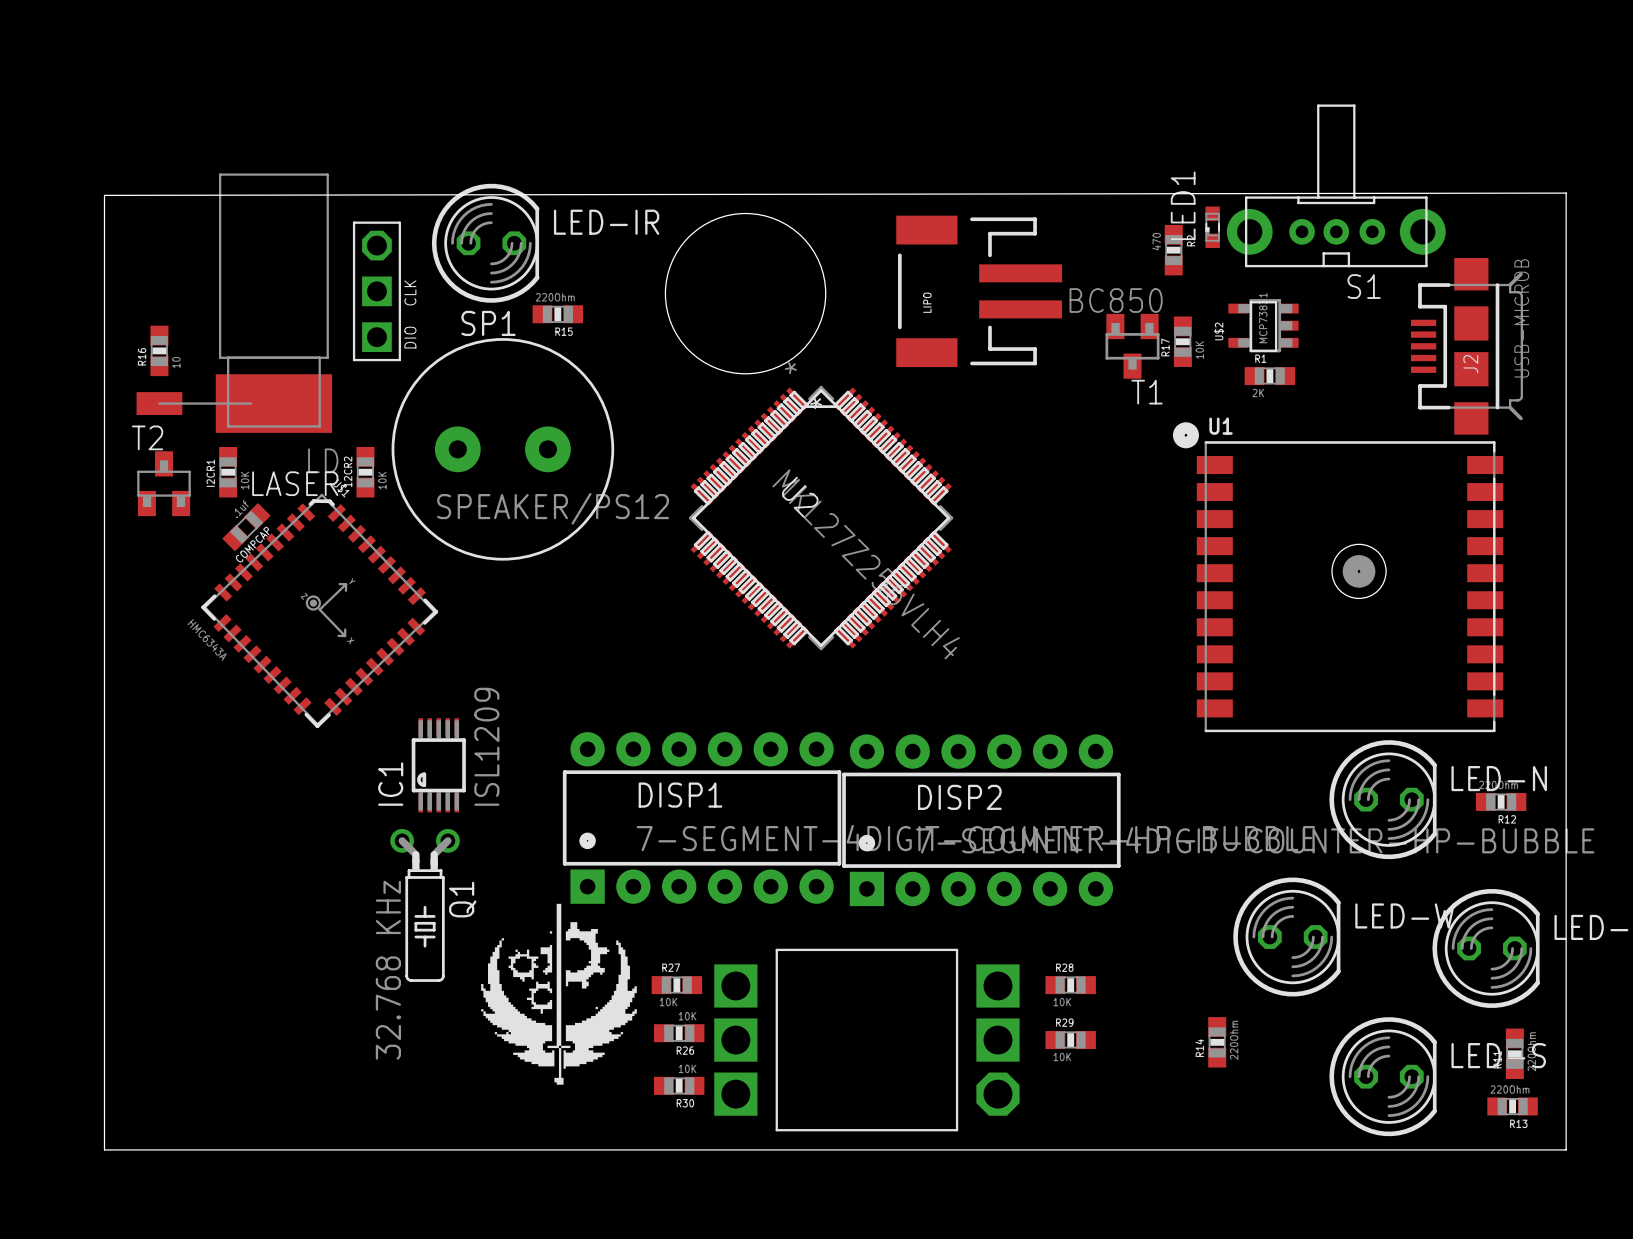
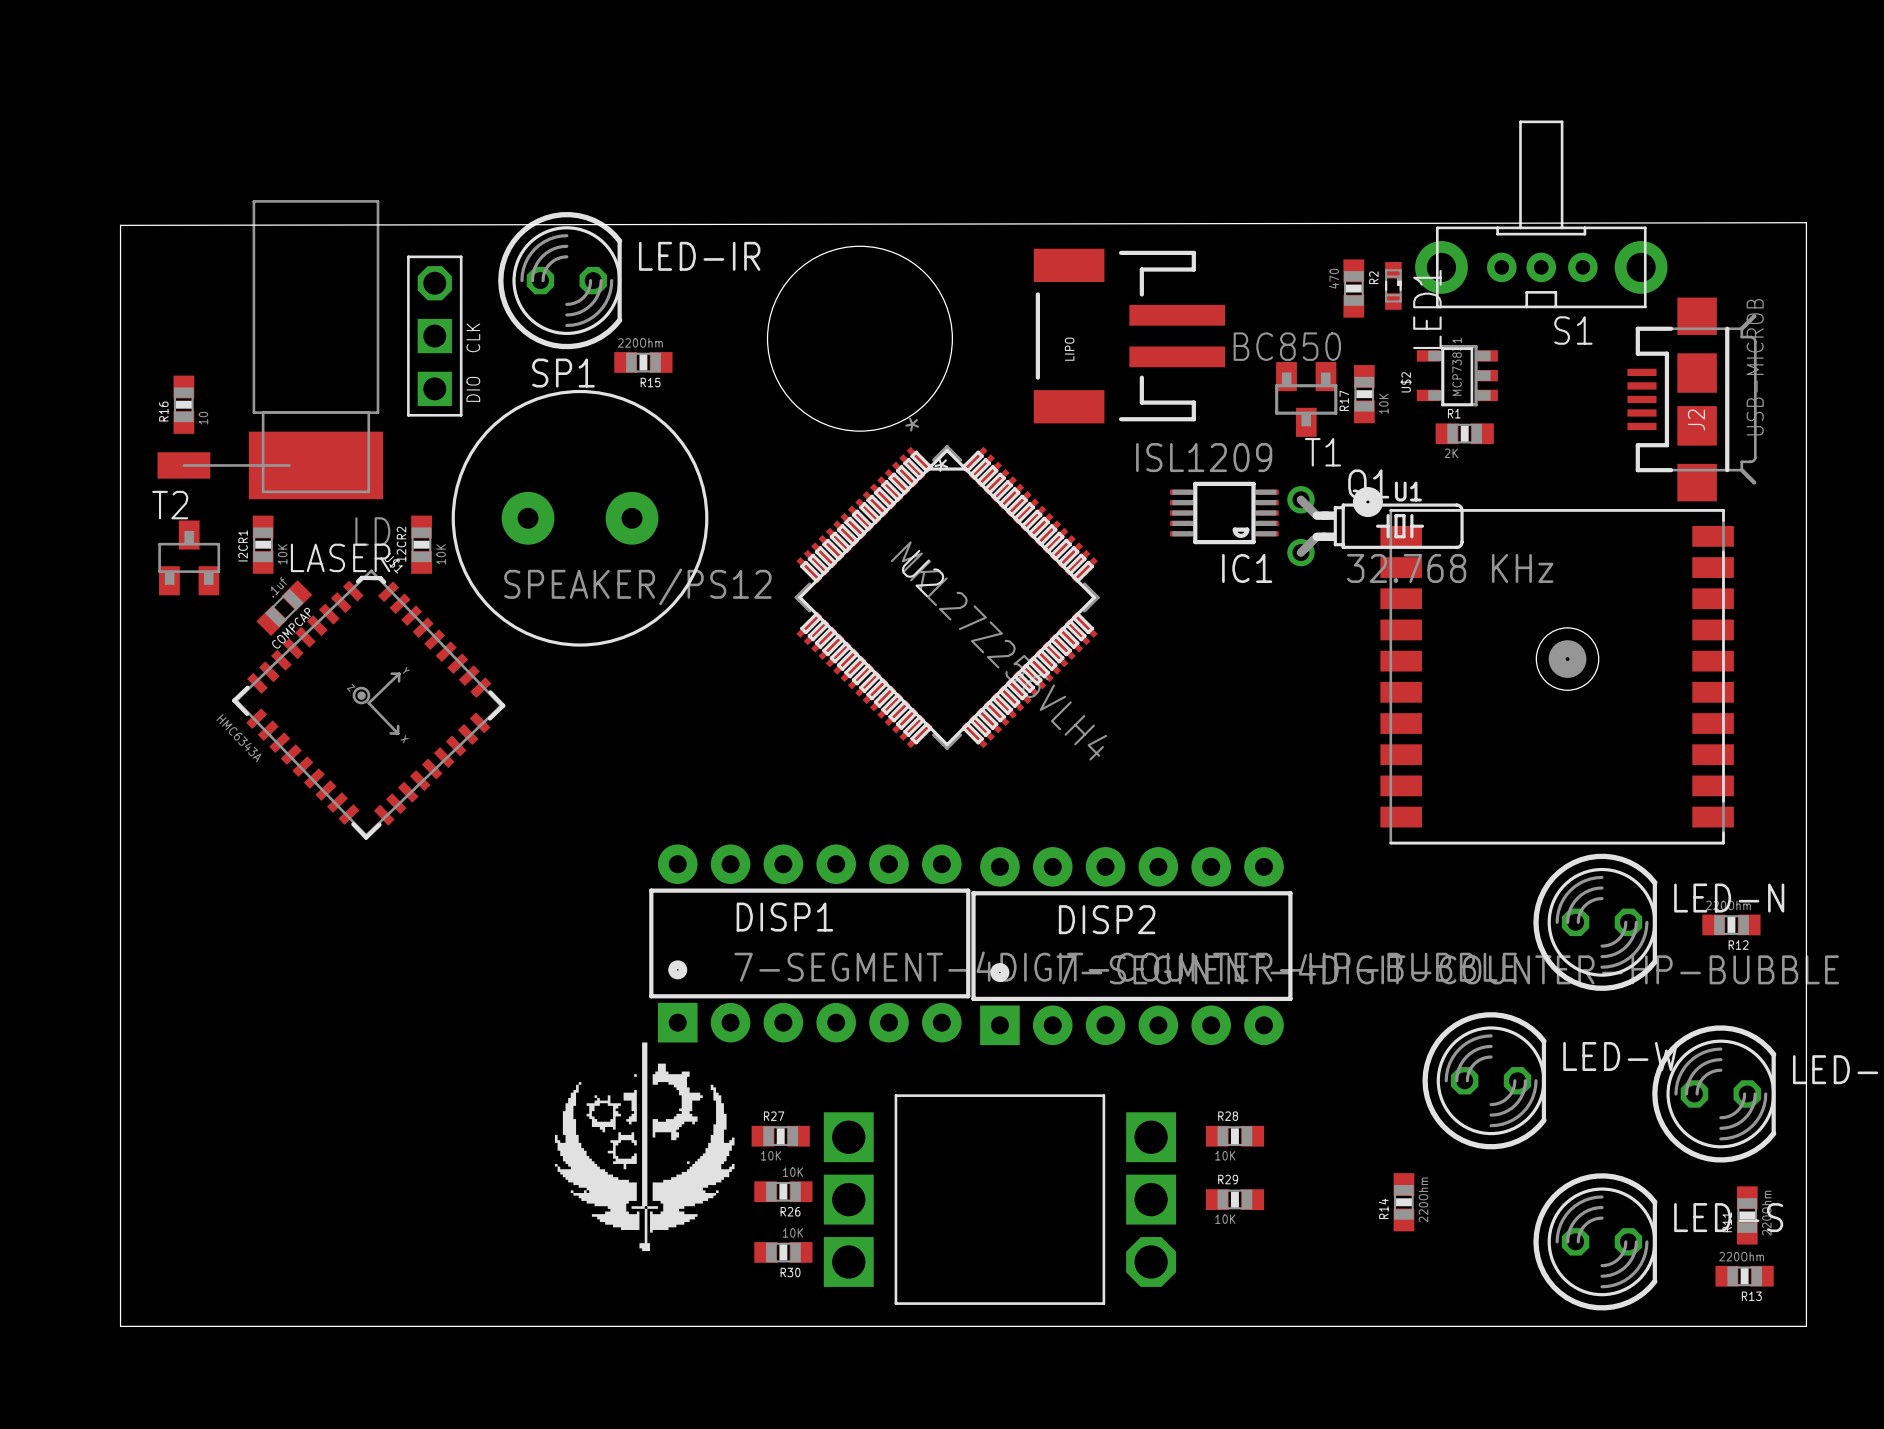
LED1 rotation: 0° (1212, 227) -> 180° (1393, 285)
IC1 rotation: 0° (438, 765) -> 90° counterclockwise (1224, 513)
IC1 position: (438, 765) -> (1224, 513)
Q1 rotation: 0° (425, 905) -> 90° counterclockwise (1375, 526)
Q1 position: (425, 905) -> (1375, 526)

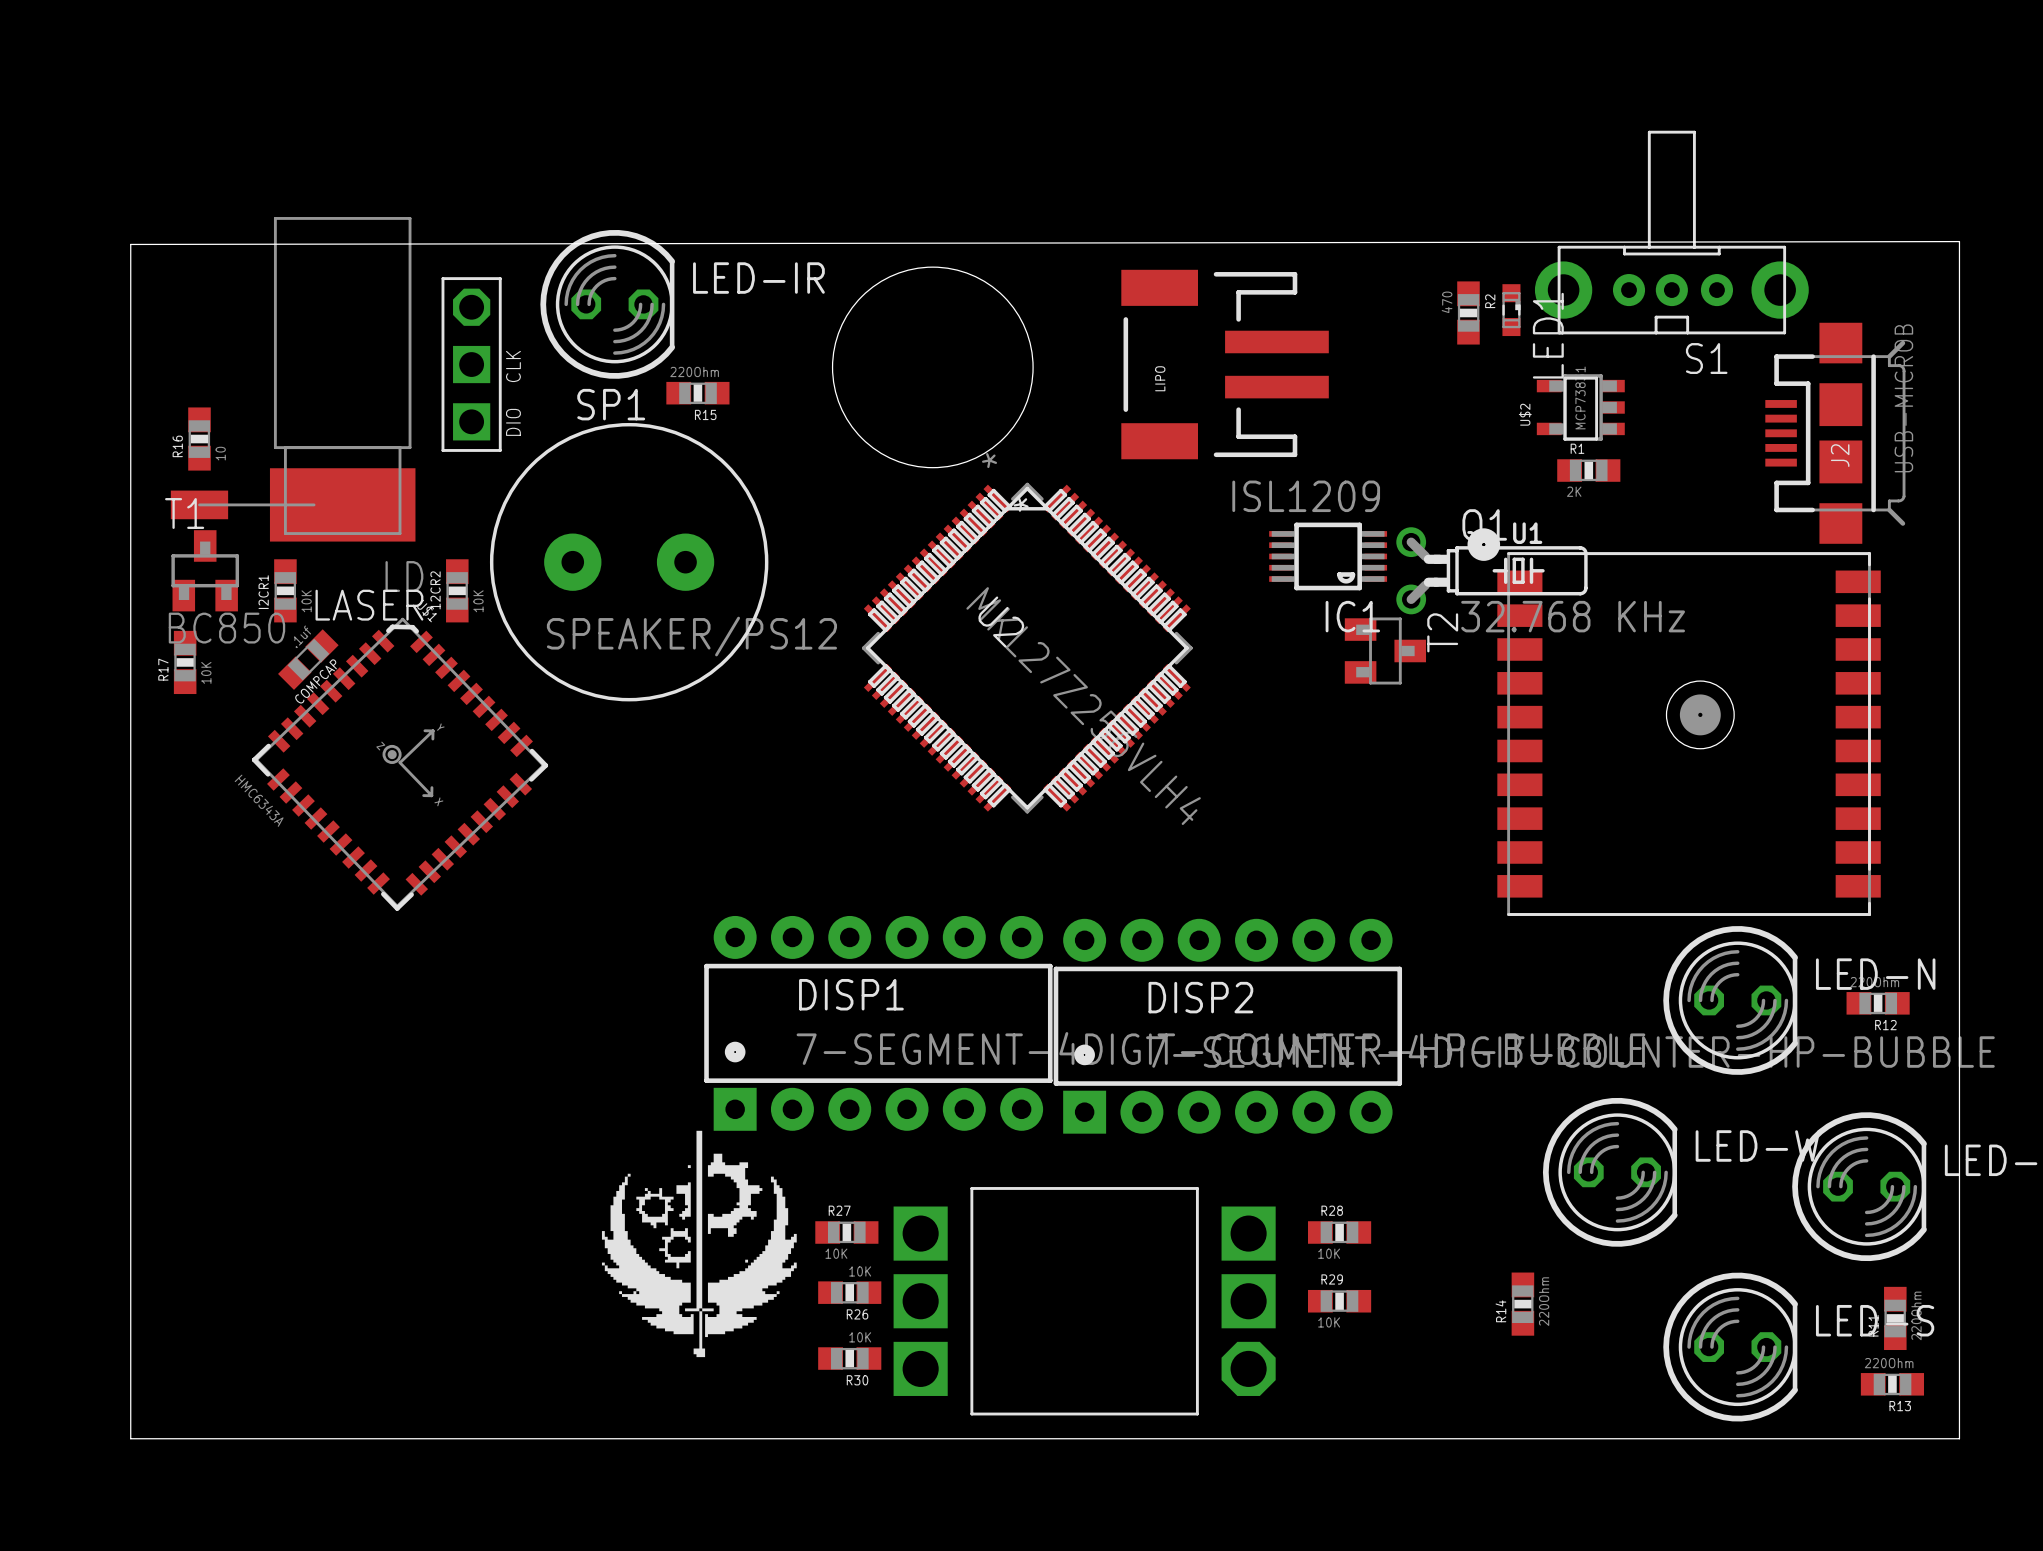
R17 position: (1364, 394) -> (185, 662)
T1 rotation: 0° (1306, 399) -> 180° (205, 570)
T1 position: (1306, 399) -> (205, 570)
T2 rotation: 0° (189, 557) -> 90° clockwise (1385, 650)
T2 position: (189, 557) -> (1385, 650)

